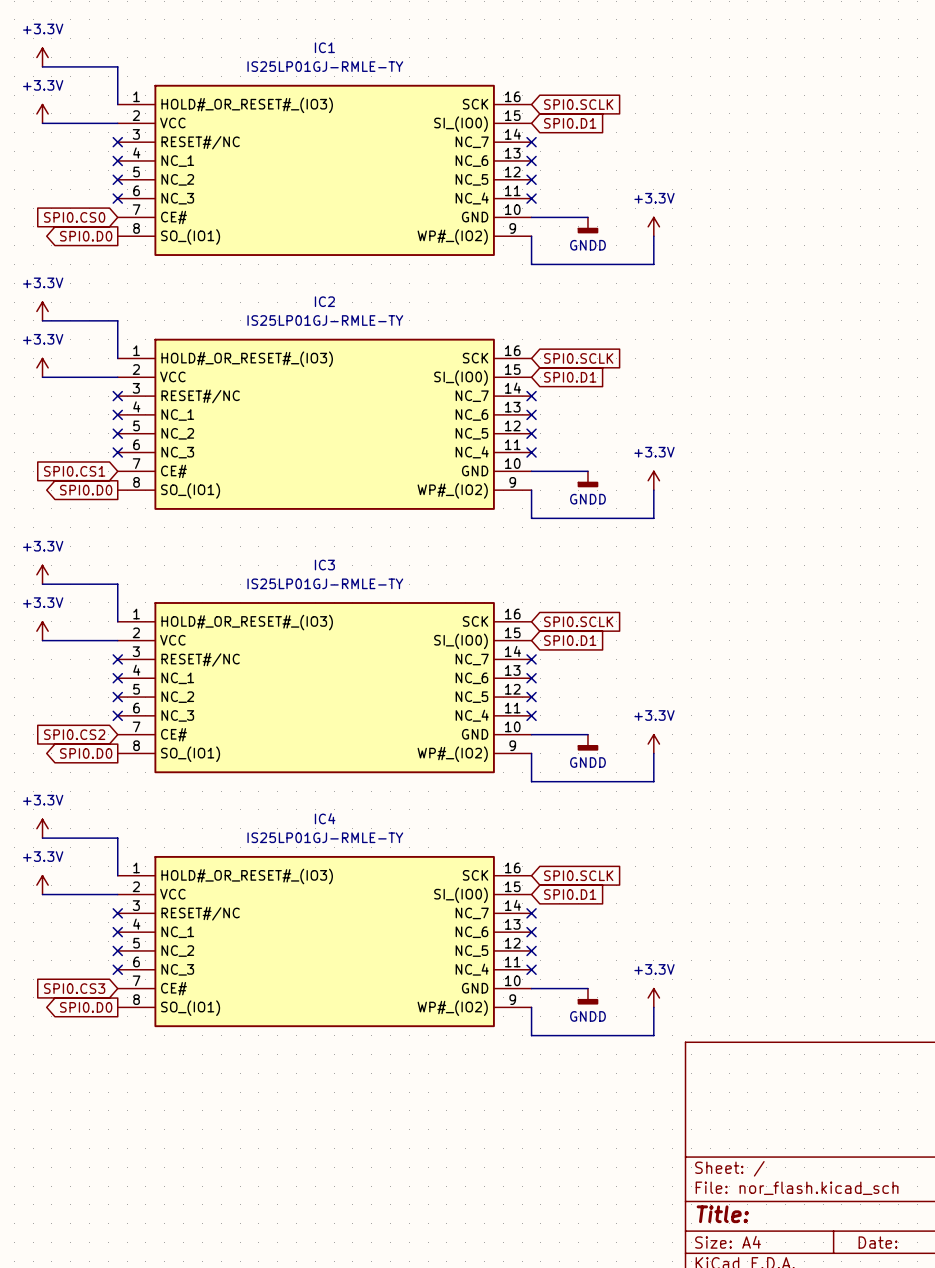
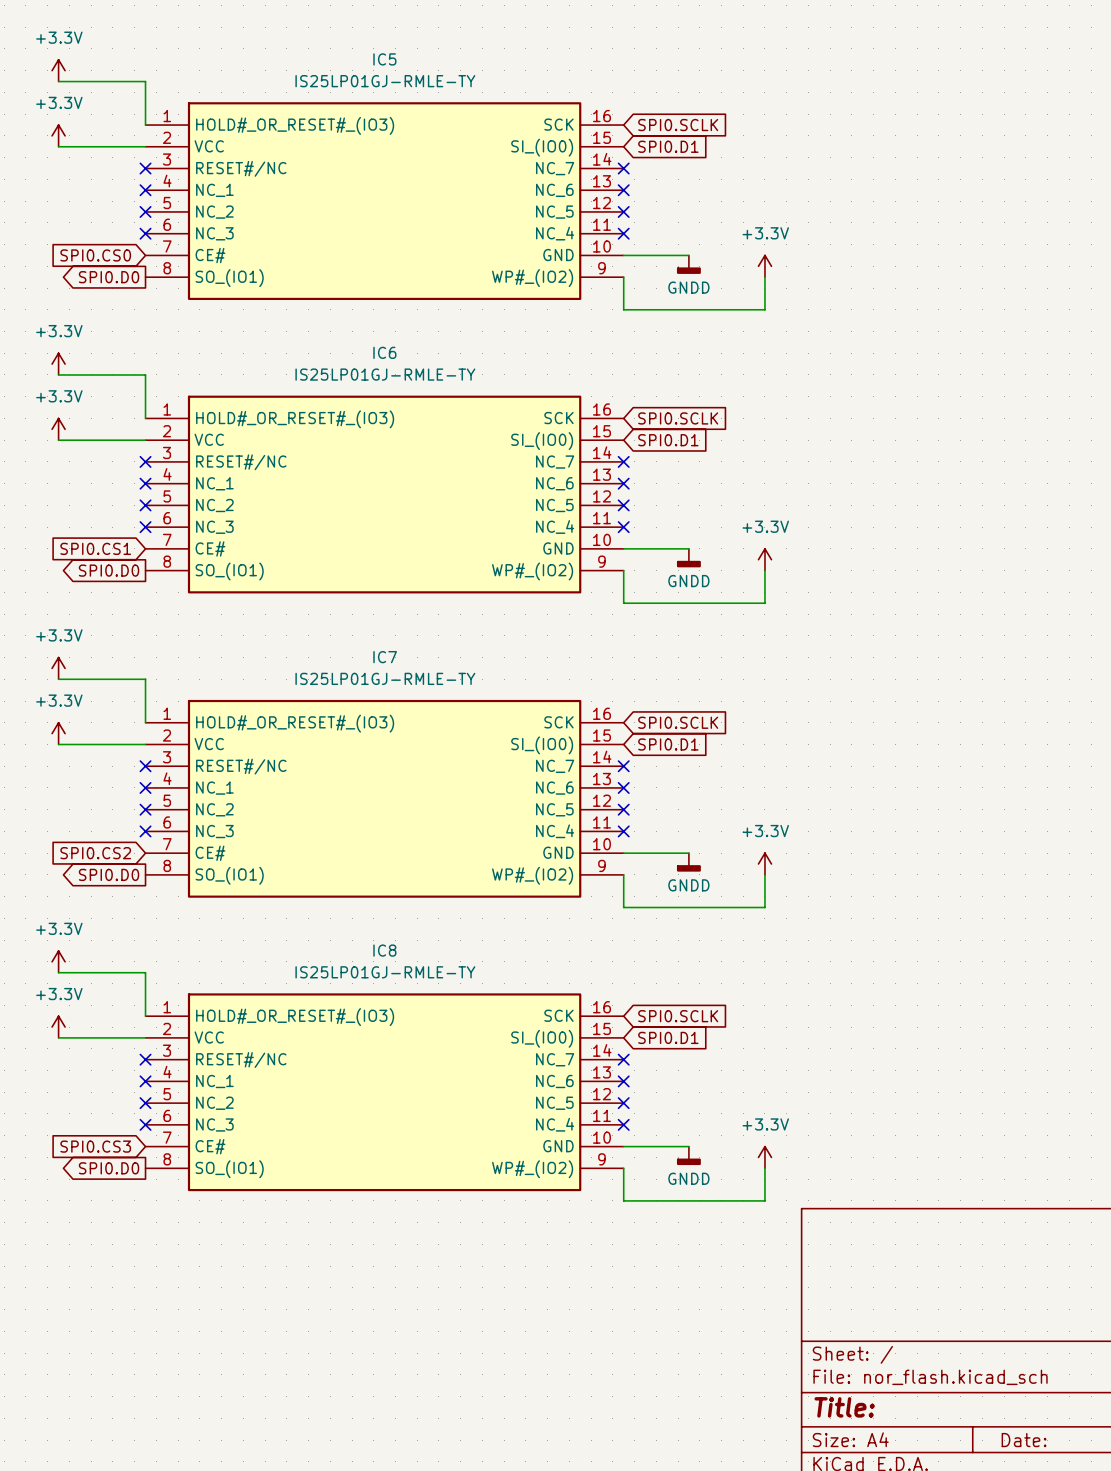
IC1 name: IC1 (324, 47) -> IC5 (384, 59)
IC2 name: IC2 (324, 301) -> IC6 (384, 352)
IC3 name: IC3 (324, 565) -> IC7 (385, 657)
IC4 name: IC4 (325, 818) -> IC8 (384, 950)

